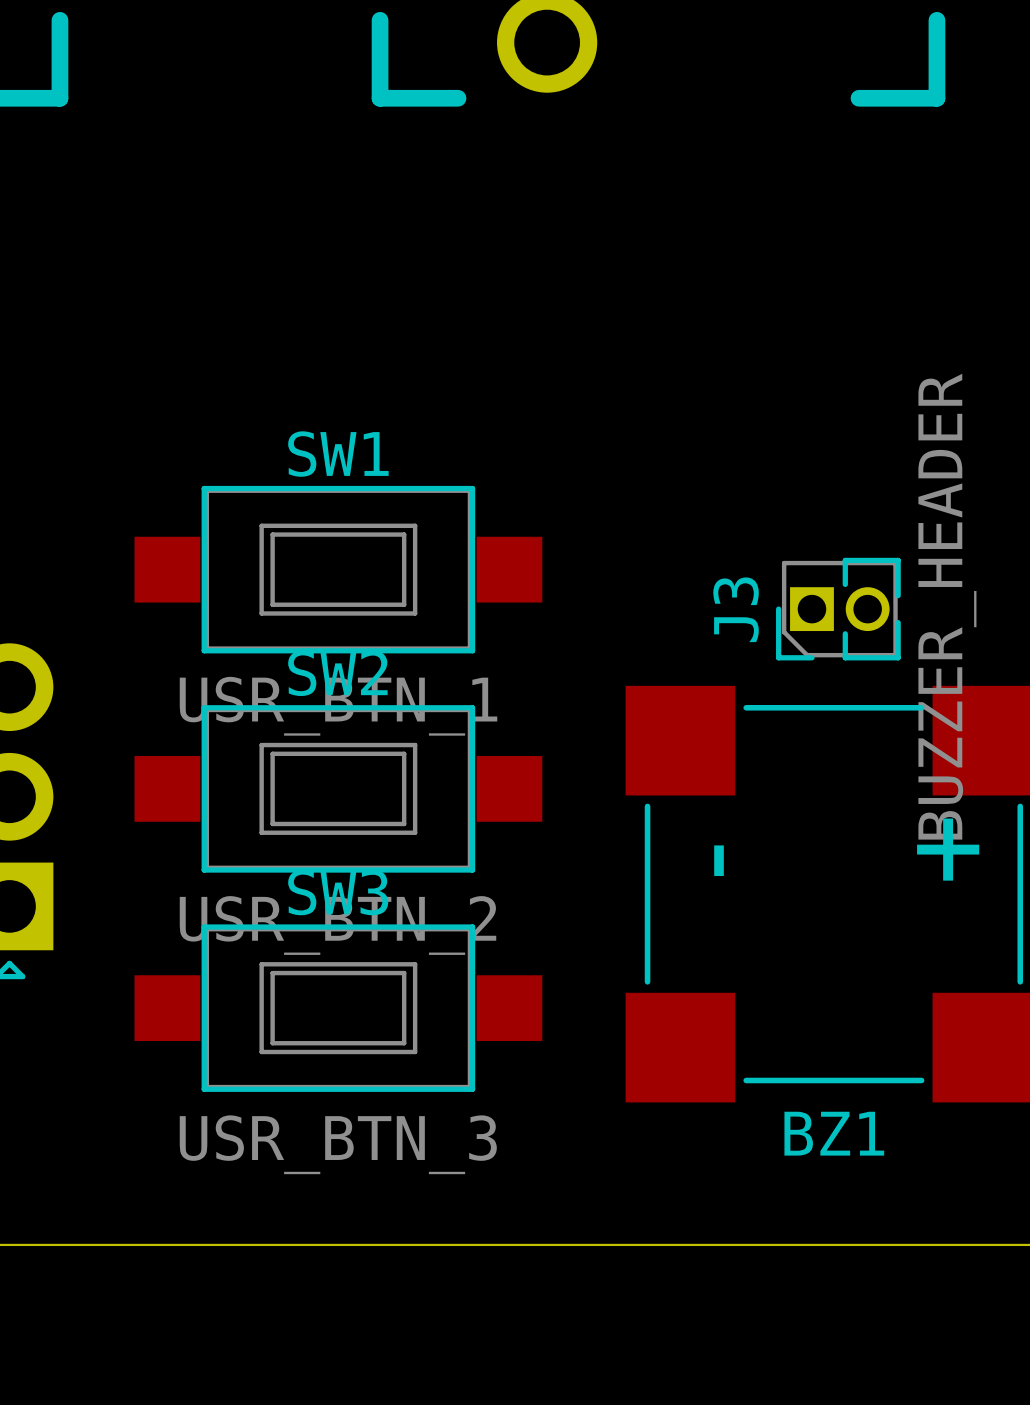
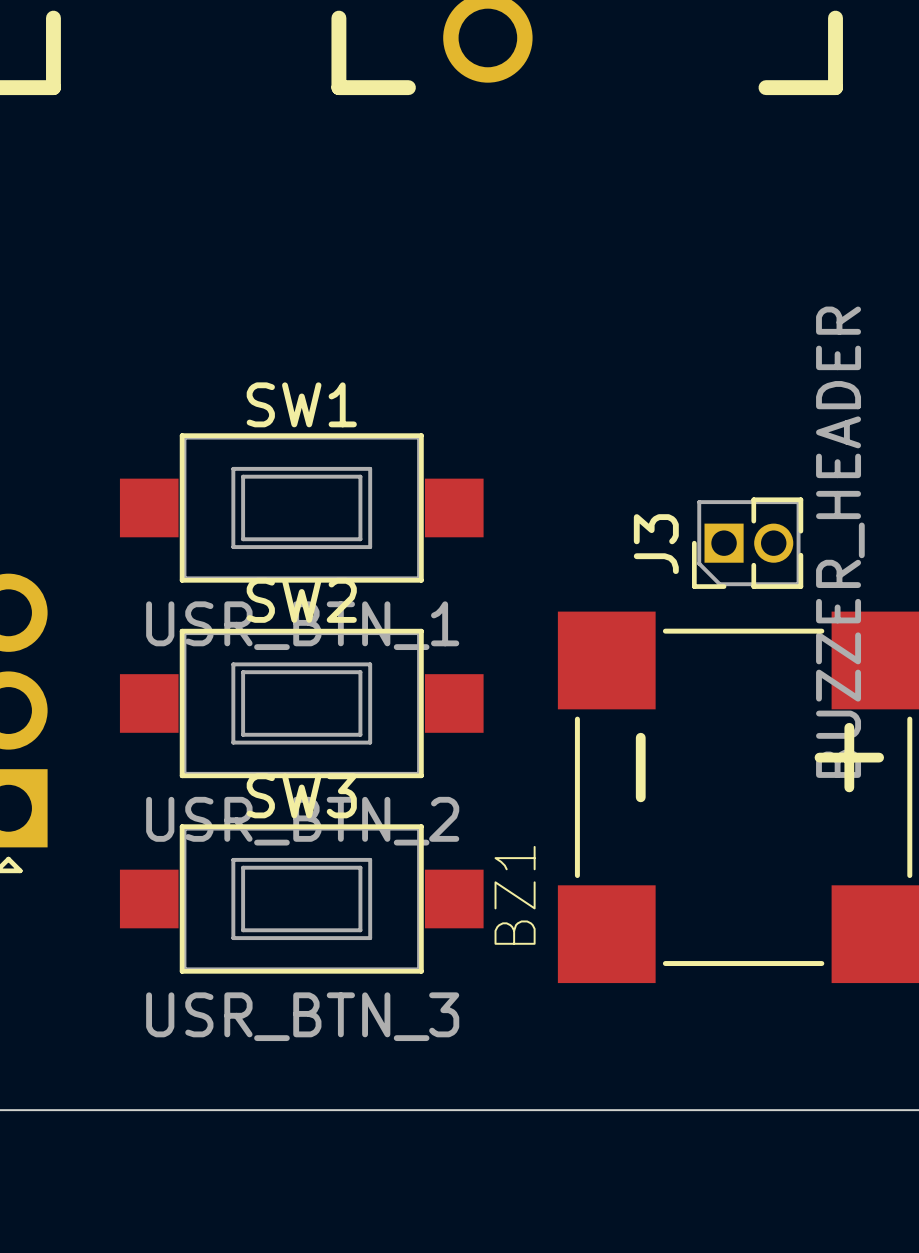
BZ1 name rotation: 0° (834, 1133) -> 90° counterclockwise (515, 895)
BZ1 name position: BZ1 (834, 1133) -> BZ1 (515, 895)

